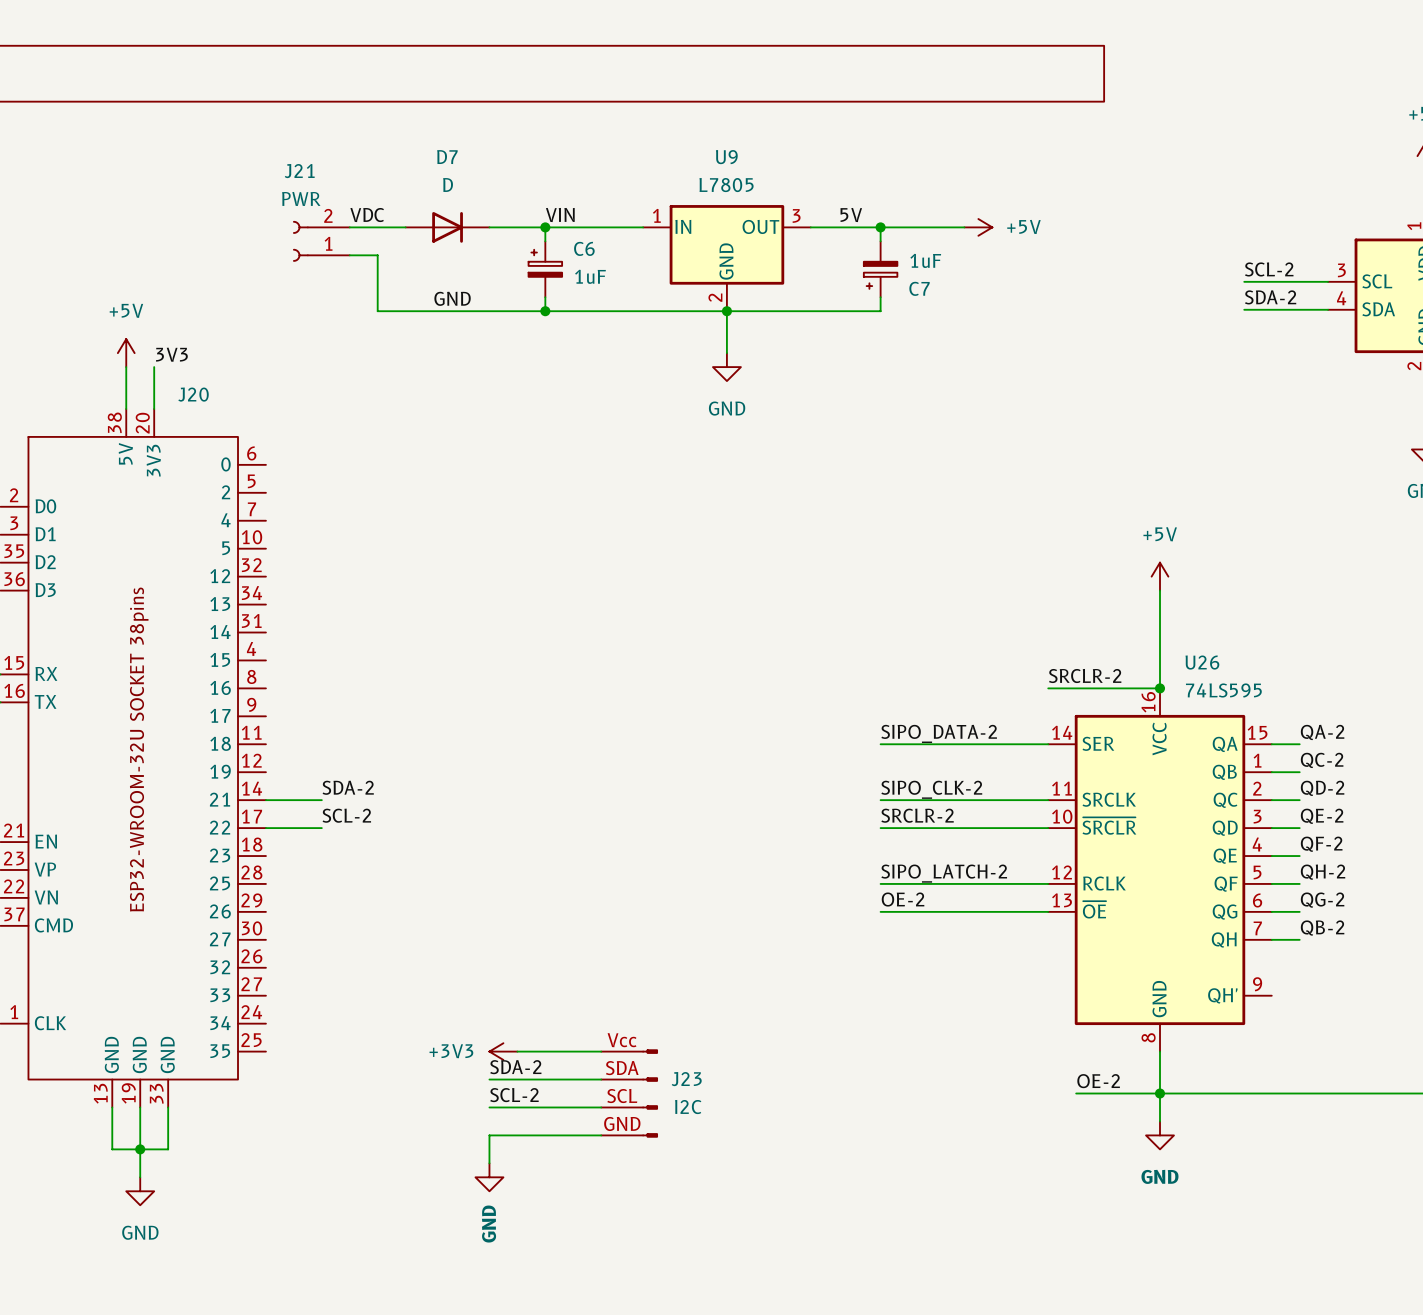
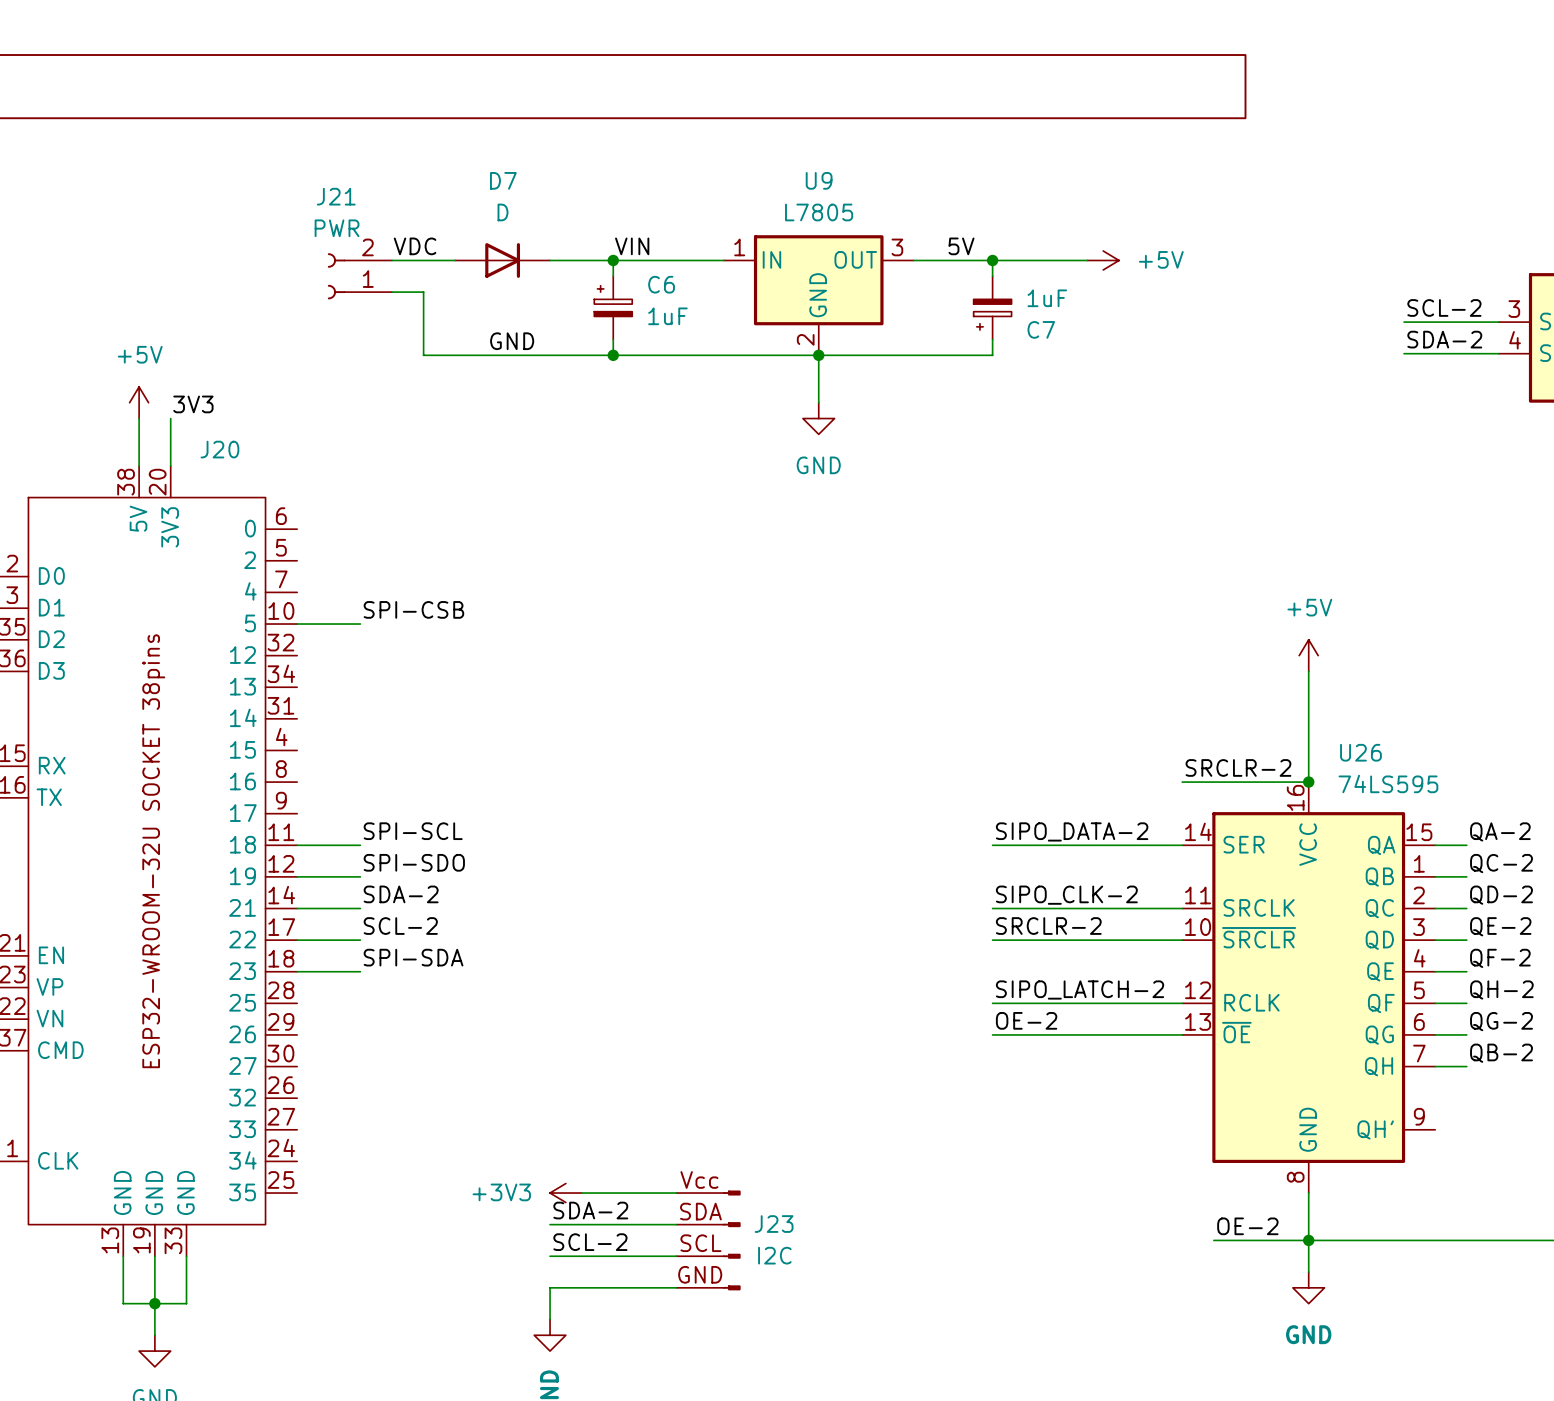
label: none -> SPI-CSB (413, 609)
wire: none -> (297, 624) (360, 624)
label: none -> SPI-SCL (413, 831)
wire: none -> (297, 845) (360, 845)
label: none -> SPI-SDO (414, 862)
wire: none -> (297, 876) (360, 876)
label: none -> SPI-SDA (413, 957)
wire: none -> (297, 971) (360, 971)

